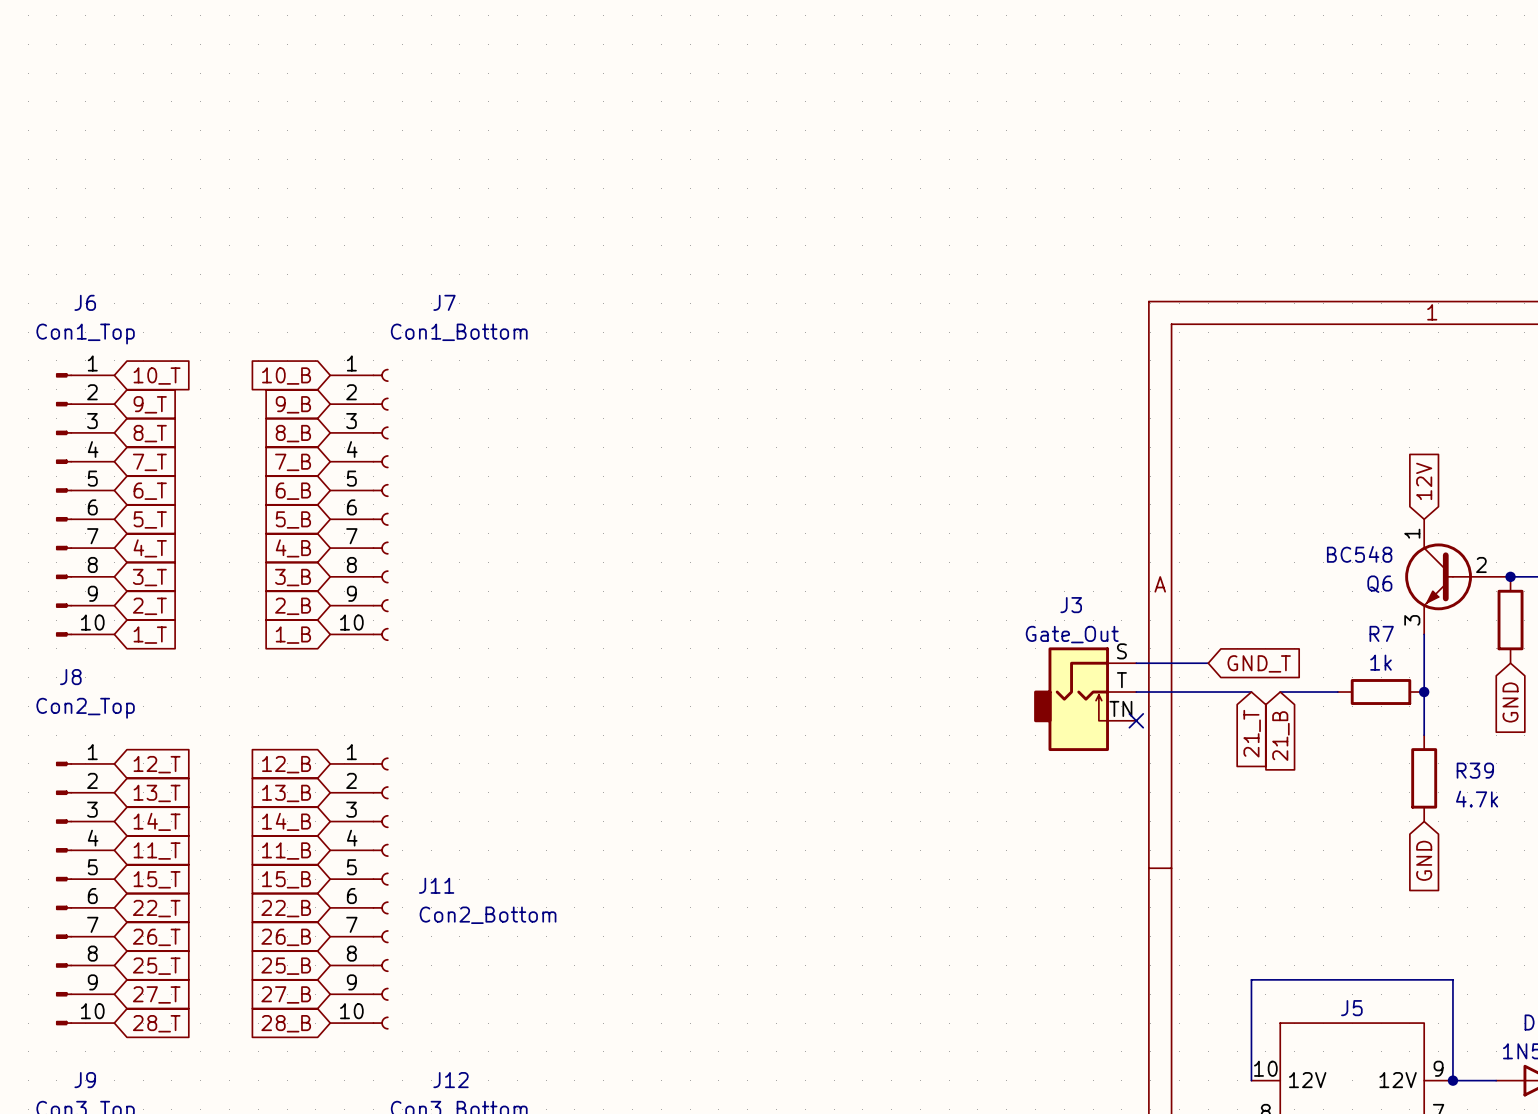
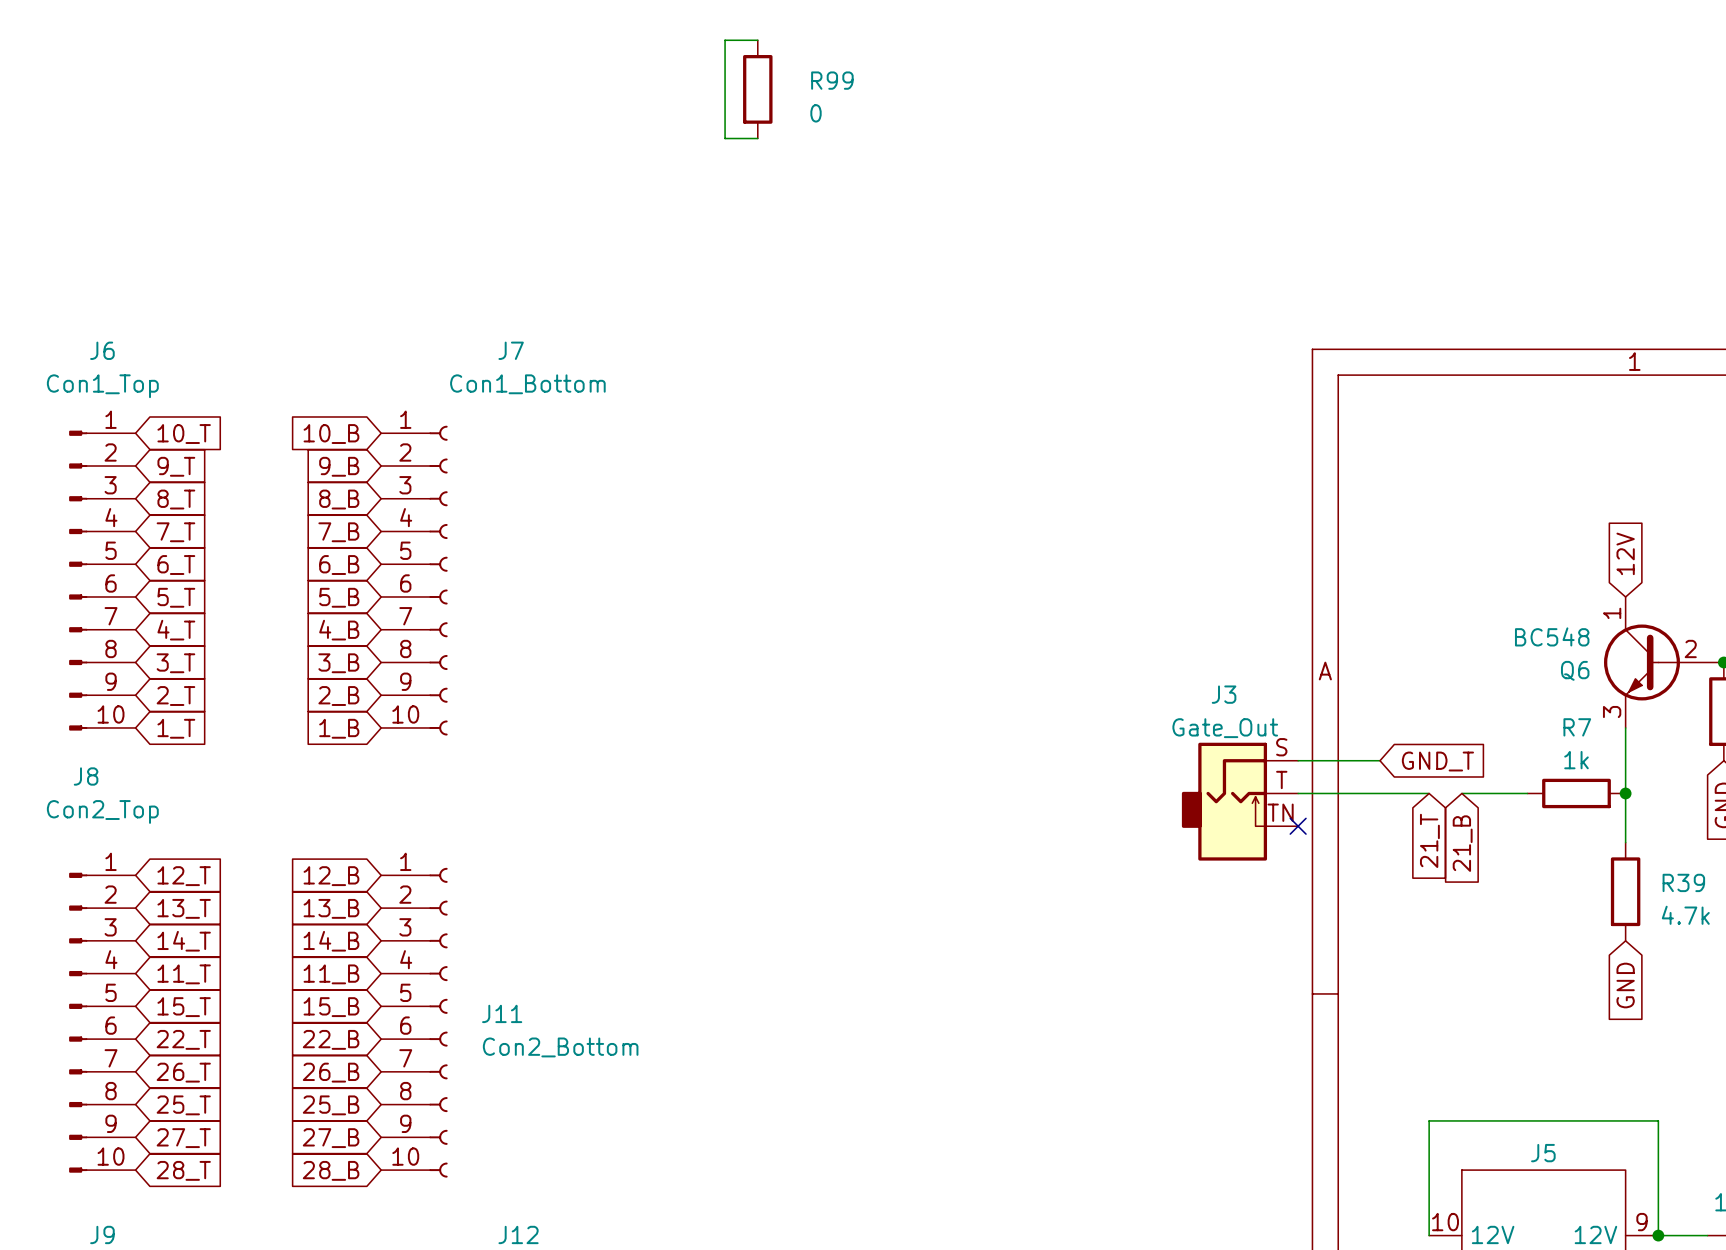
wire: none -> (757, 40) (725, 40) (725, 138) (757, 138)
R99: none -> 0 (757, 89)

